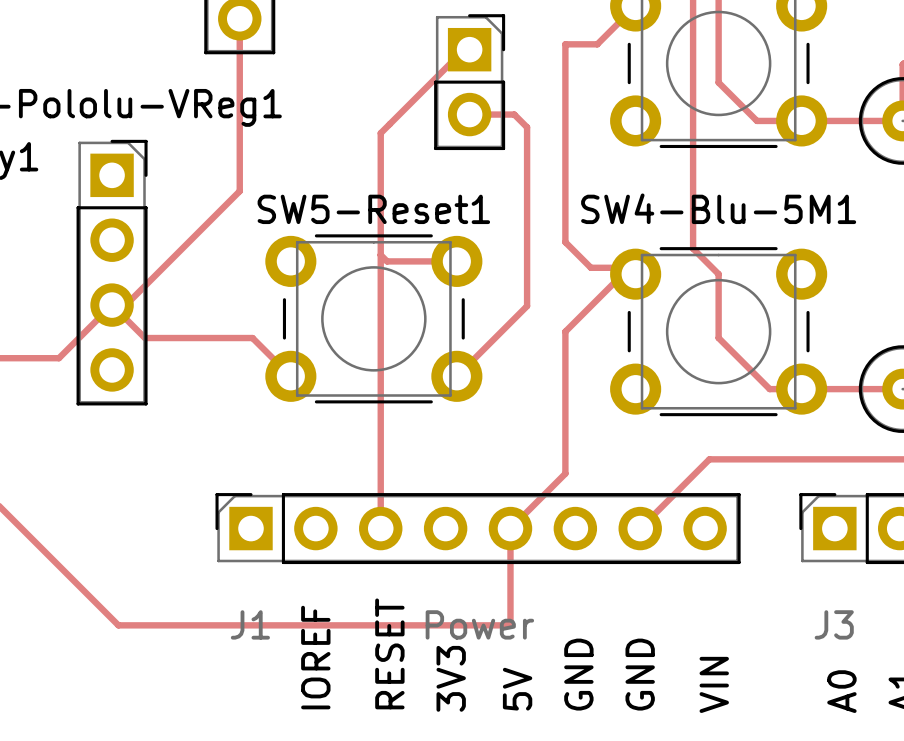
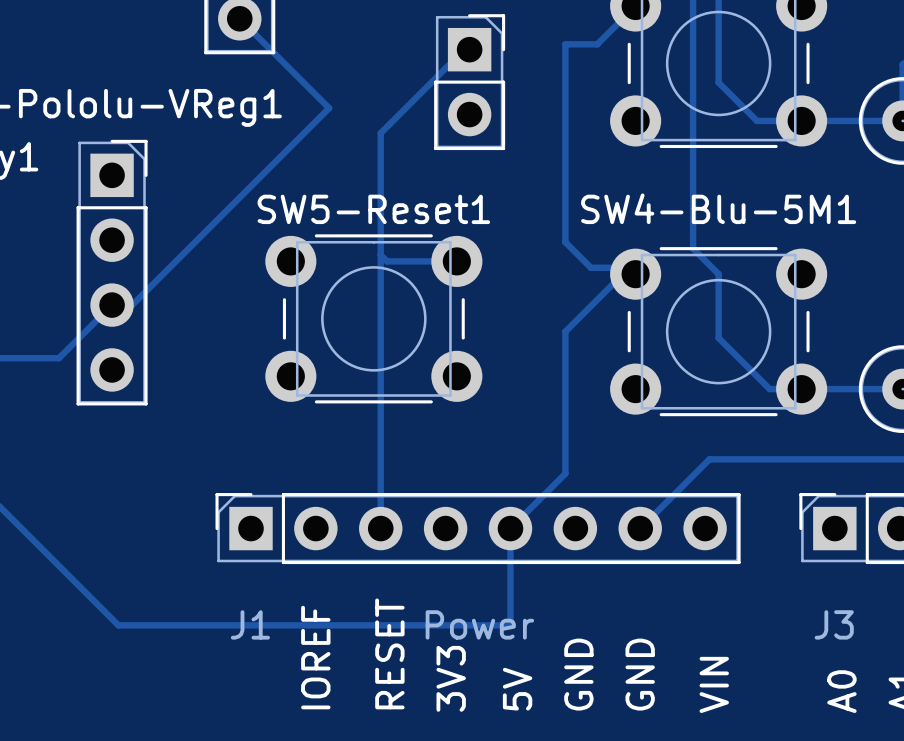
track: (239, 18) (239, 191) (125, 305) -> (239, 18) (329, 108) (132, 305) (125, 305)
track: (469, 114) (514, 114) (527, 127) (527, 306) (456, 376) -> none
track: (112, 305) (145, 338) (252, 338) (290, 376) -> none

